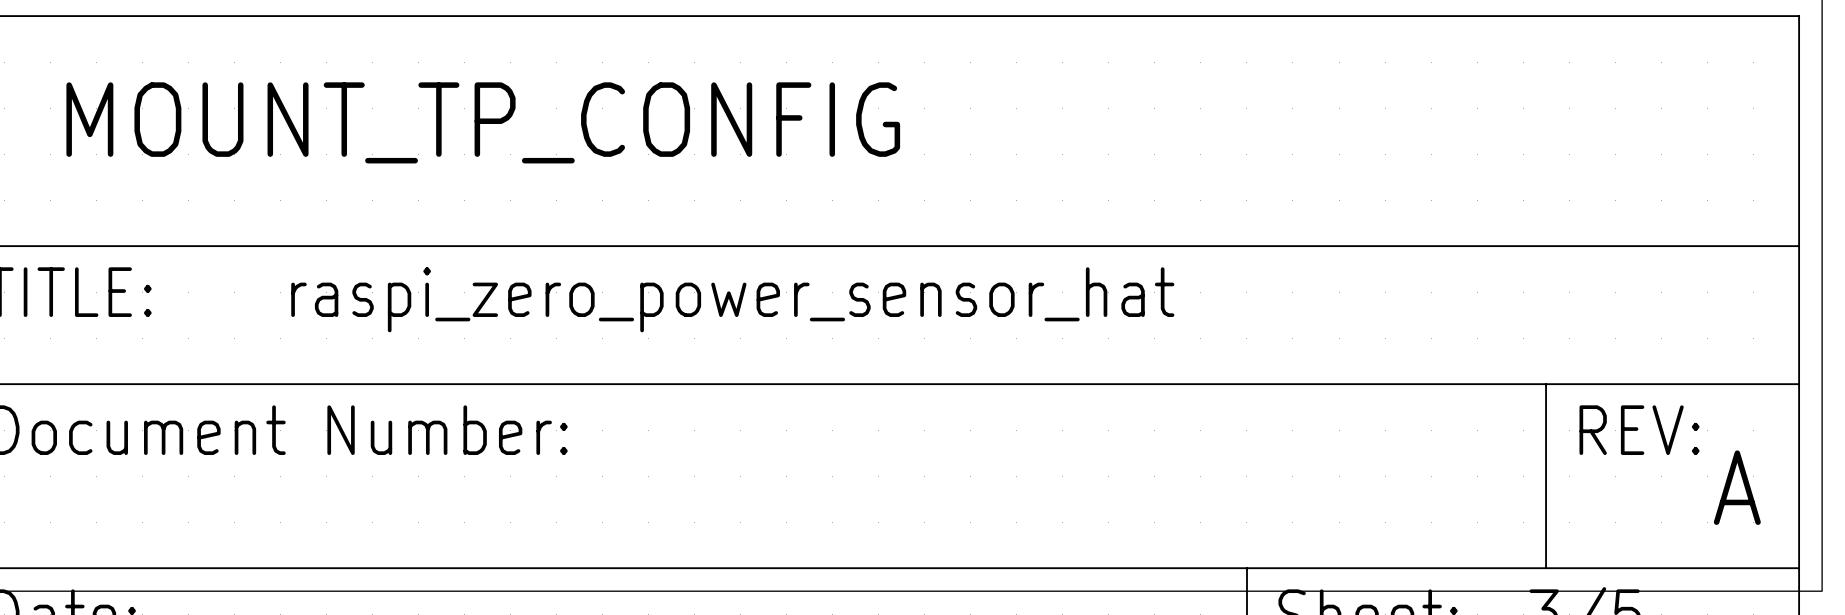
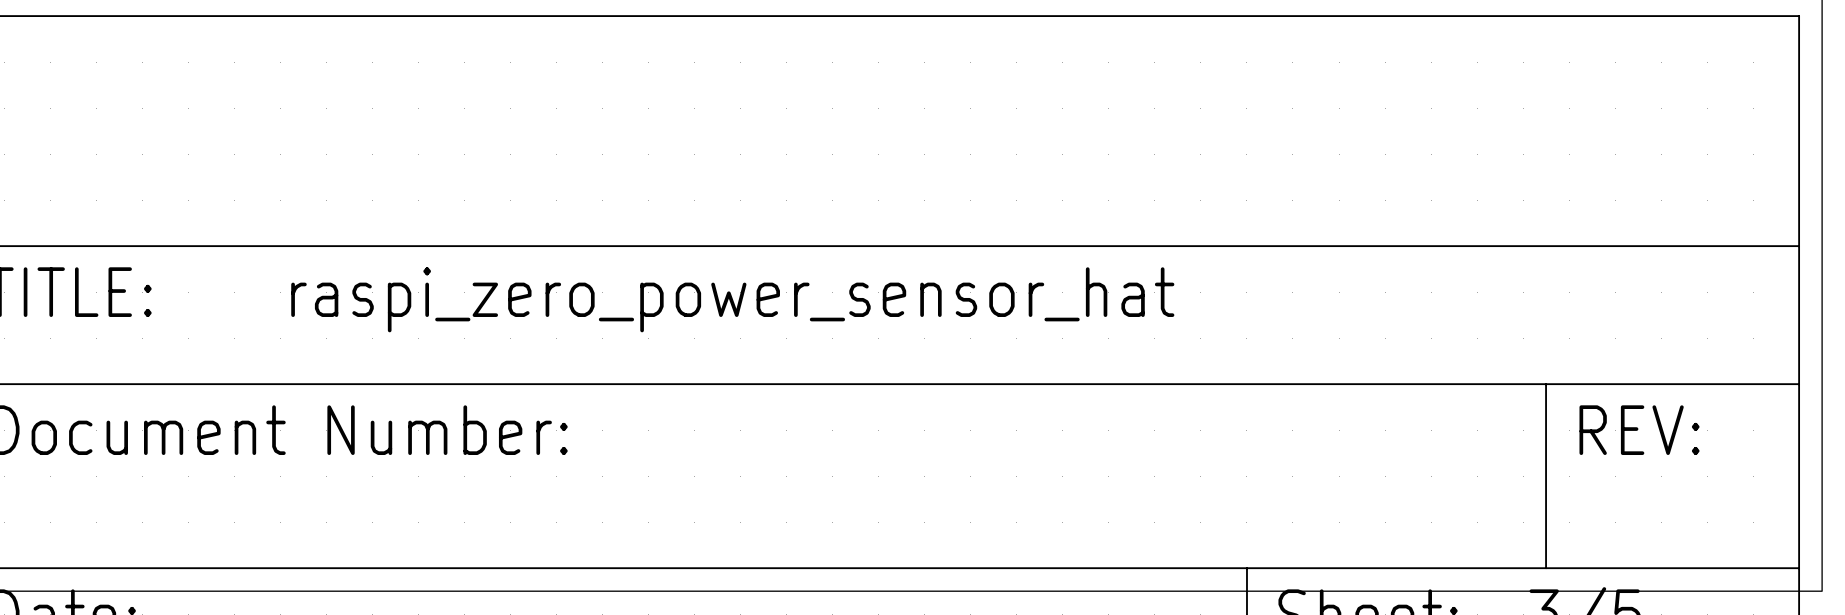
text: MOUNT_TP_CONFIG (483, 122) -> none
text: A (1737, 487) -> none

